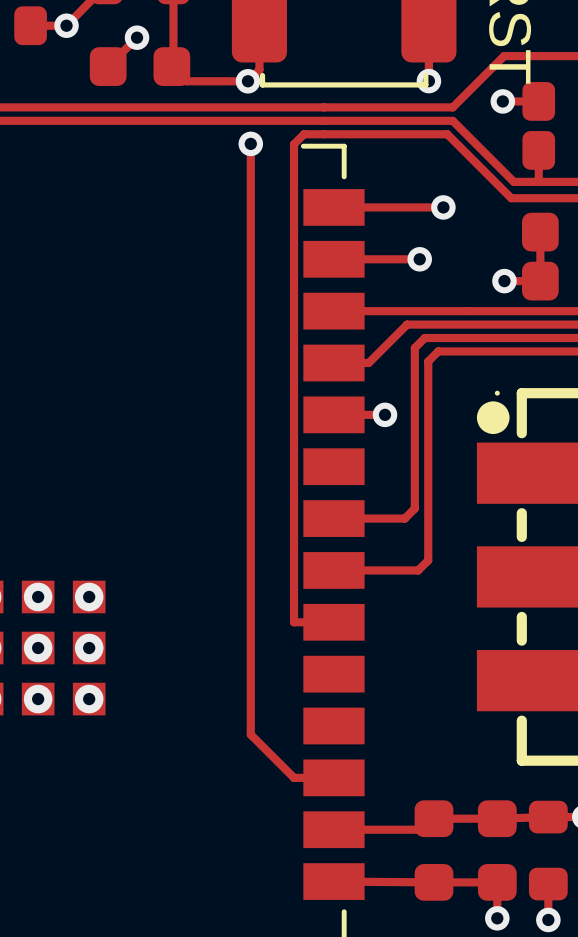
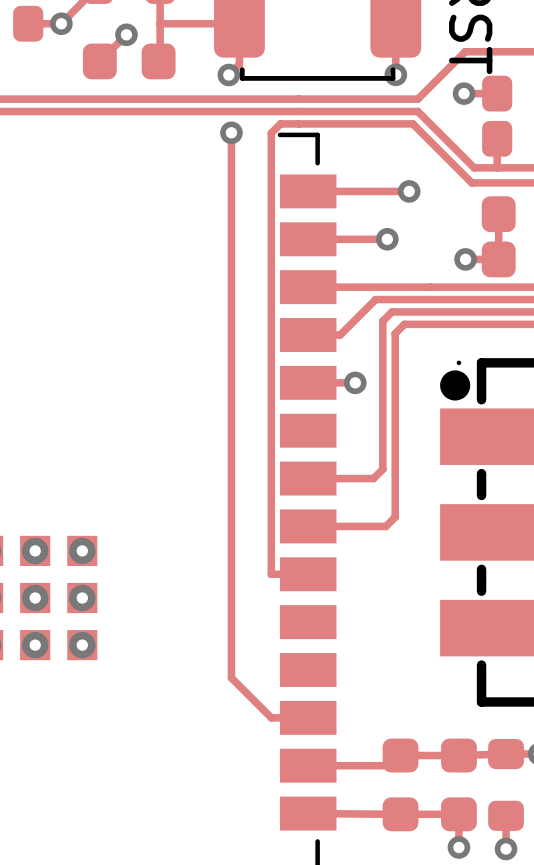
track: none -> (160, 23) (239, 23)
track: (171, 66) (186, 81) (247, 81) -> none

